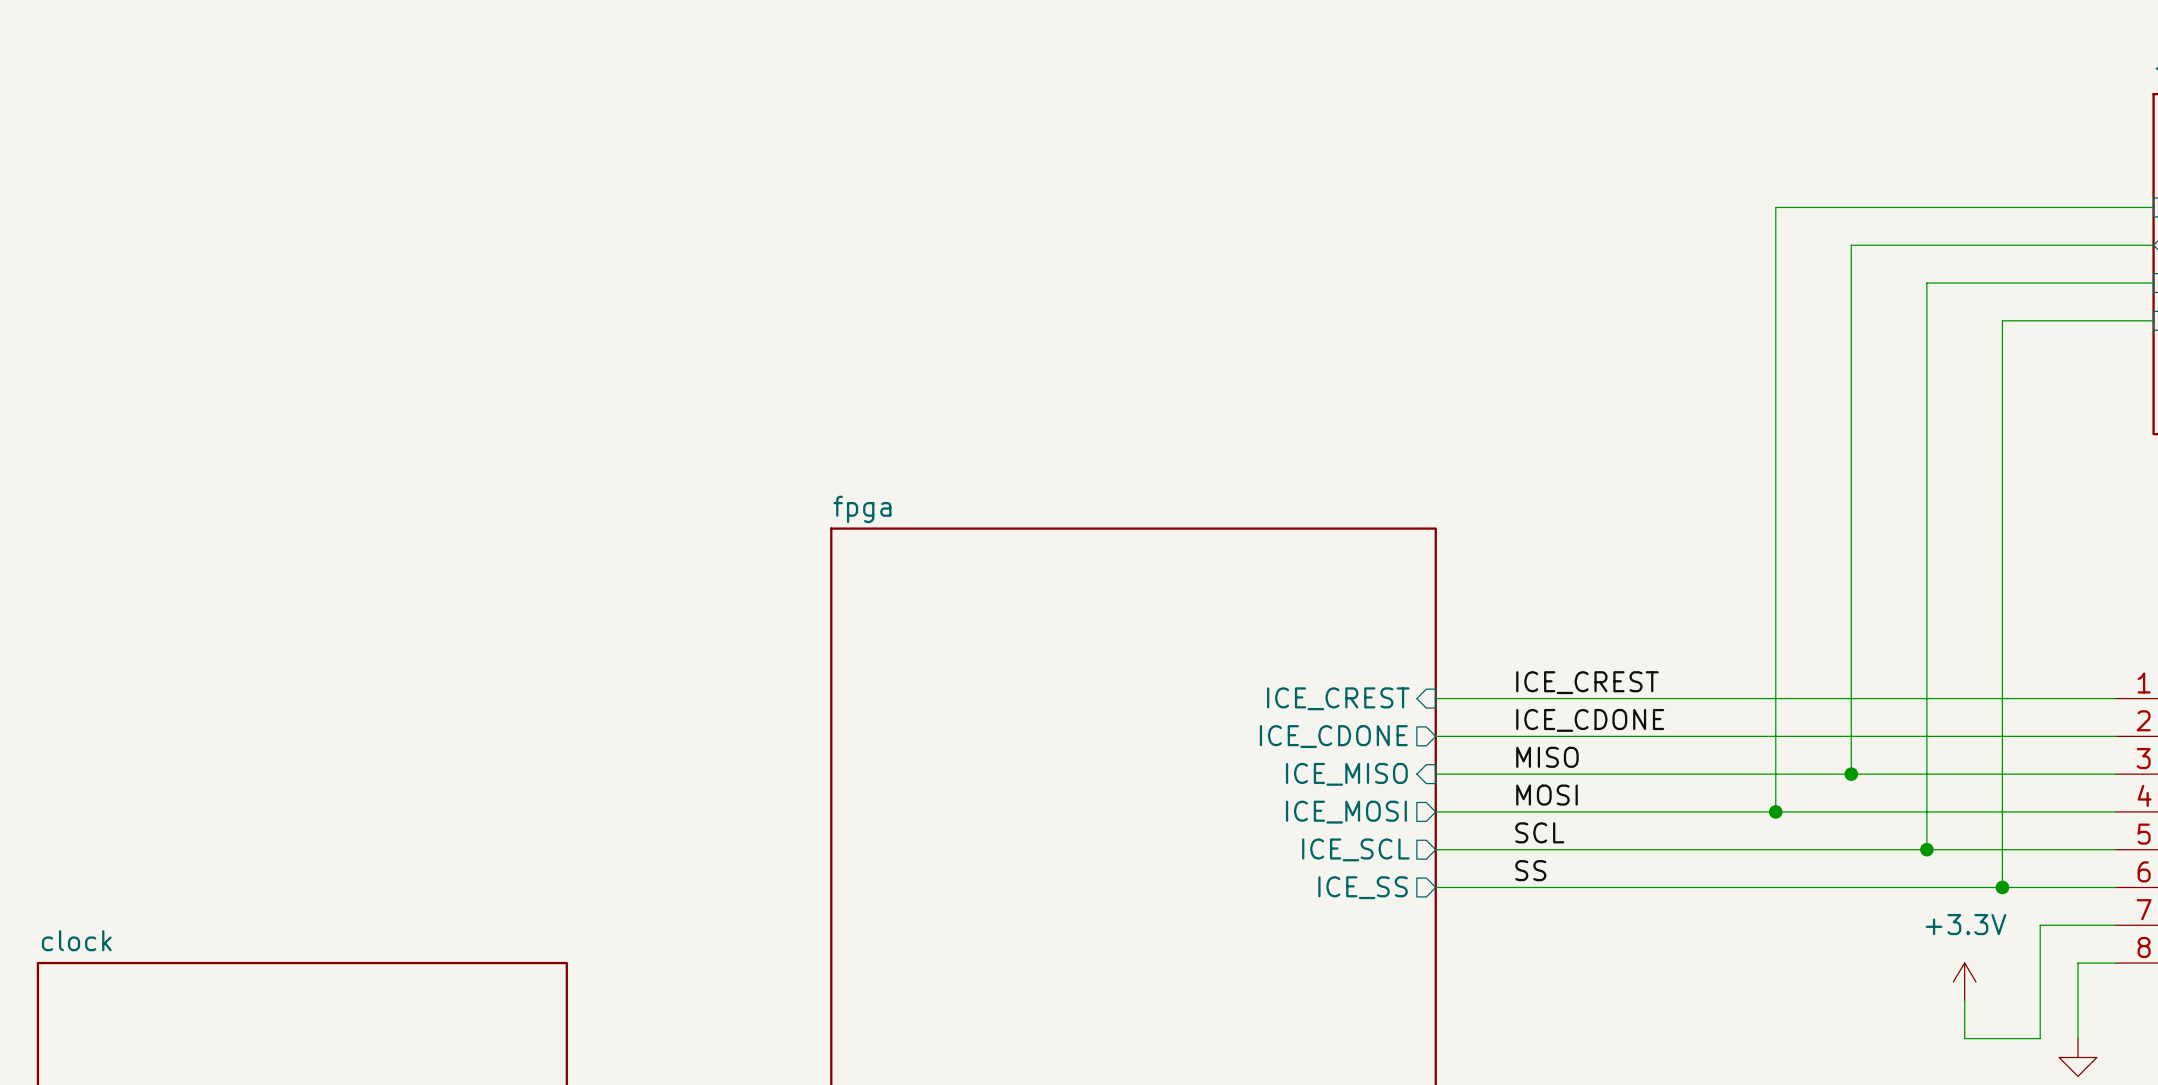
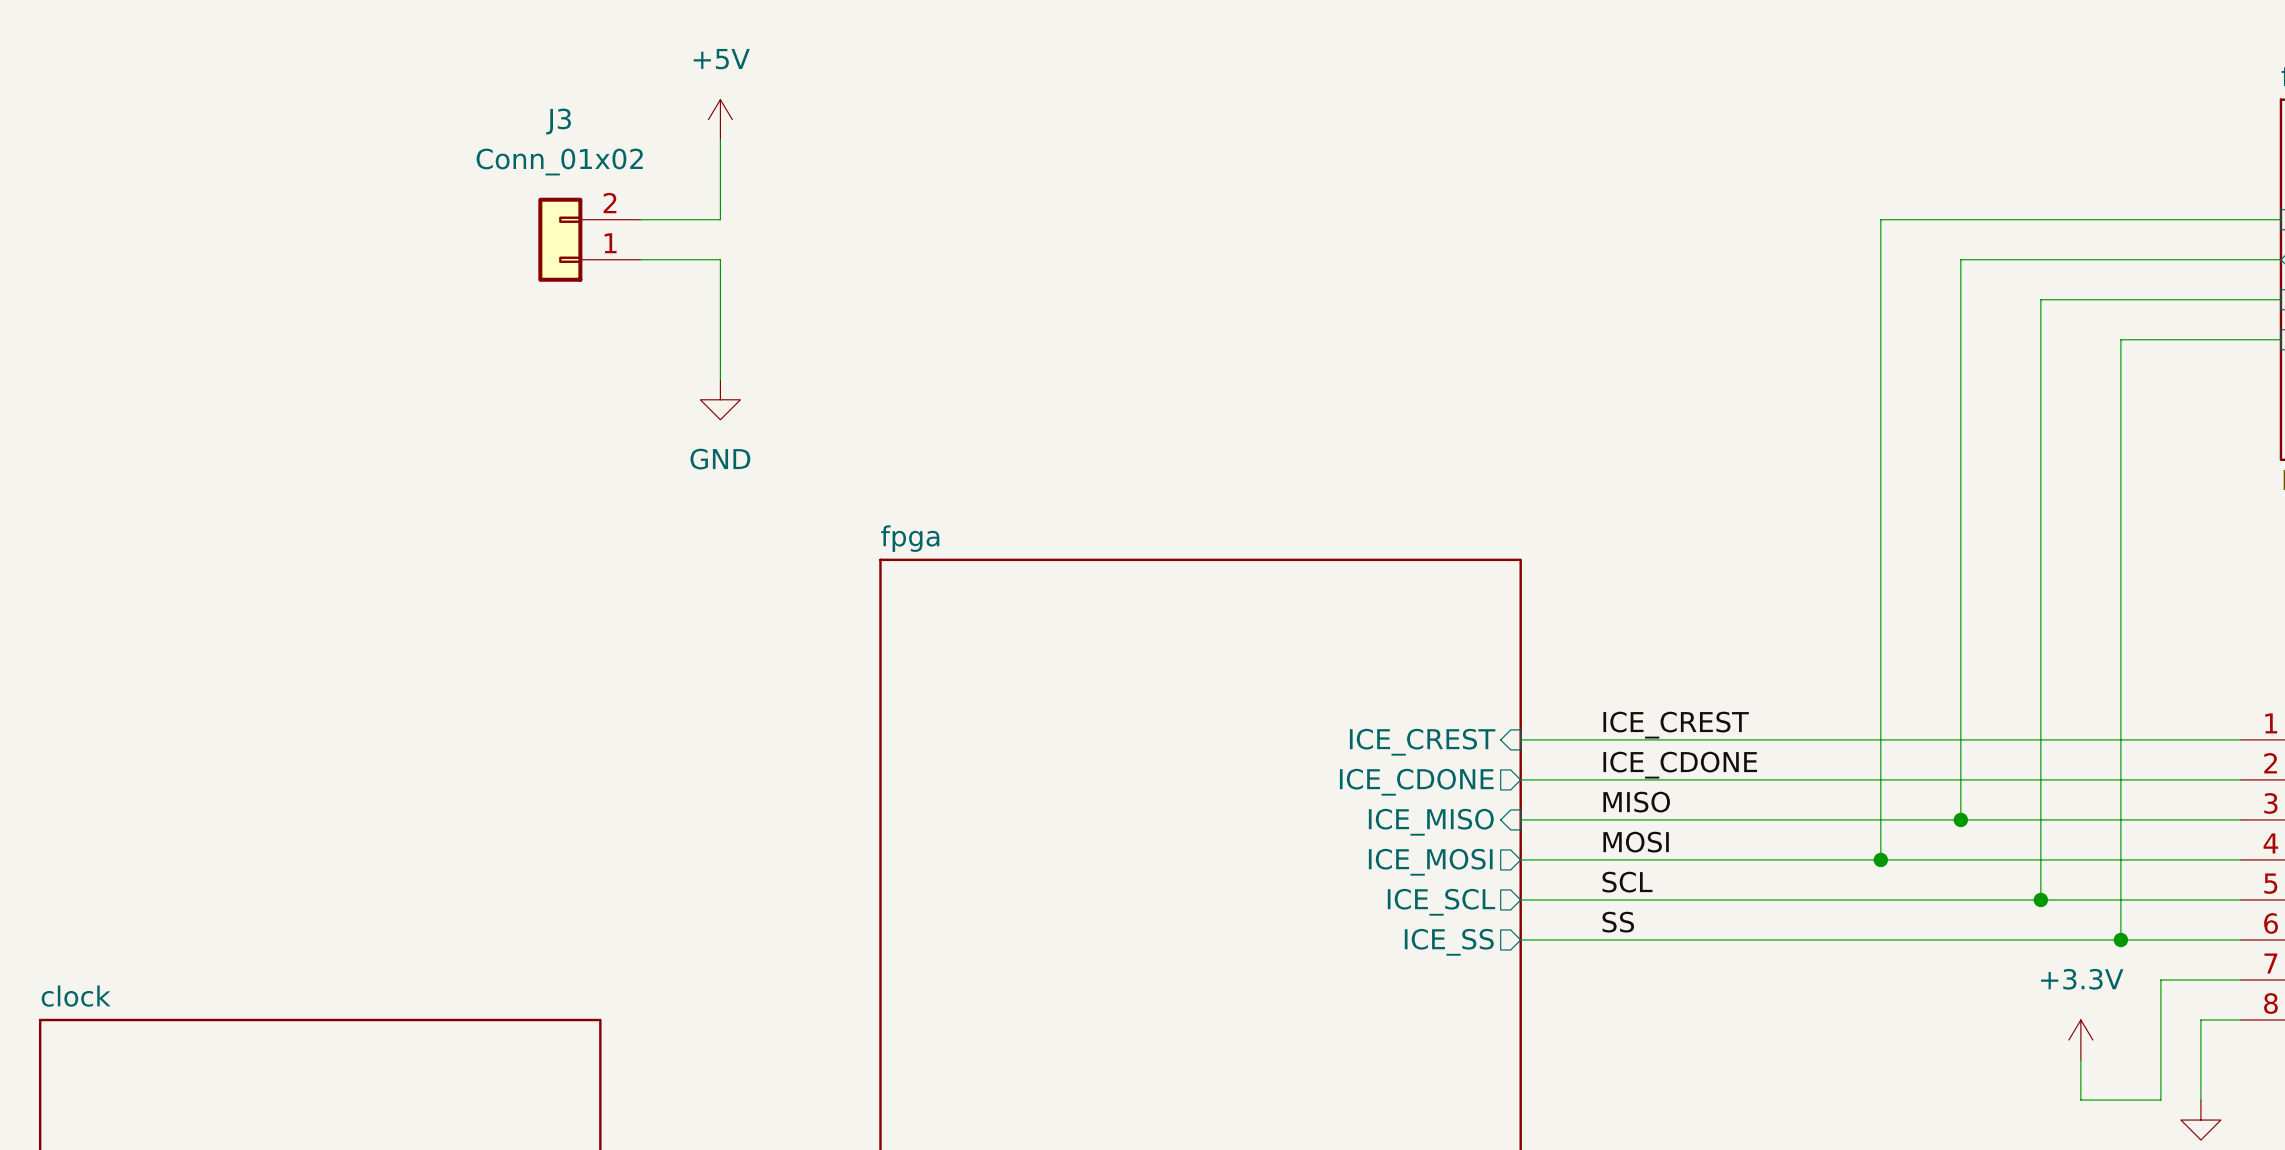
power symbol: none -> +5V (720, 119)
wire: none -> (720, 139) (720, 219) (640, 219)
J3: none -> Conn_01x02 (589, 239)
wire: none -> (640, 259) (720, 259) (720, 379)
power symbol: none -> GND (720, 399)

